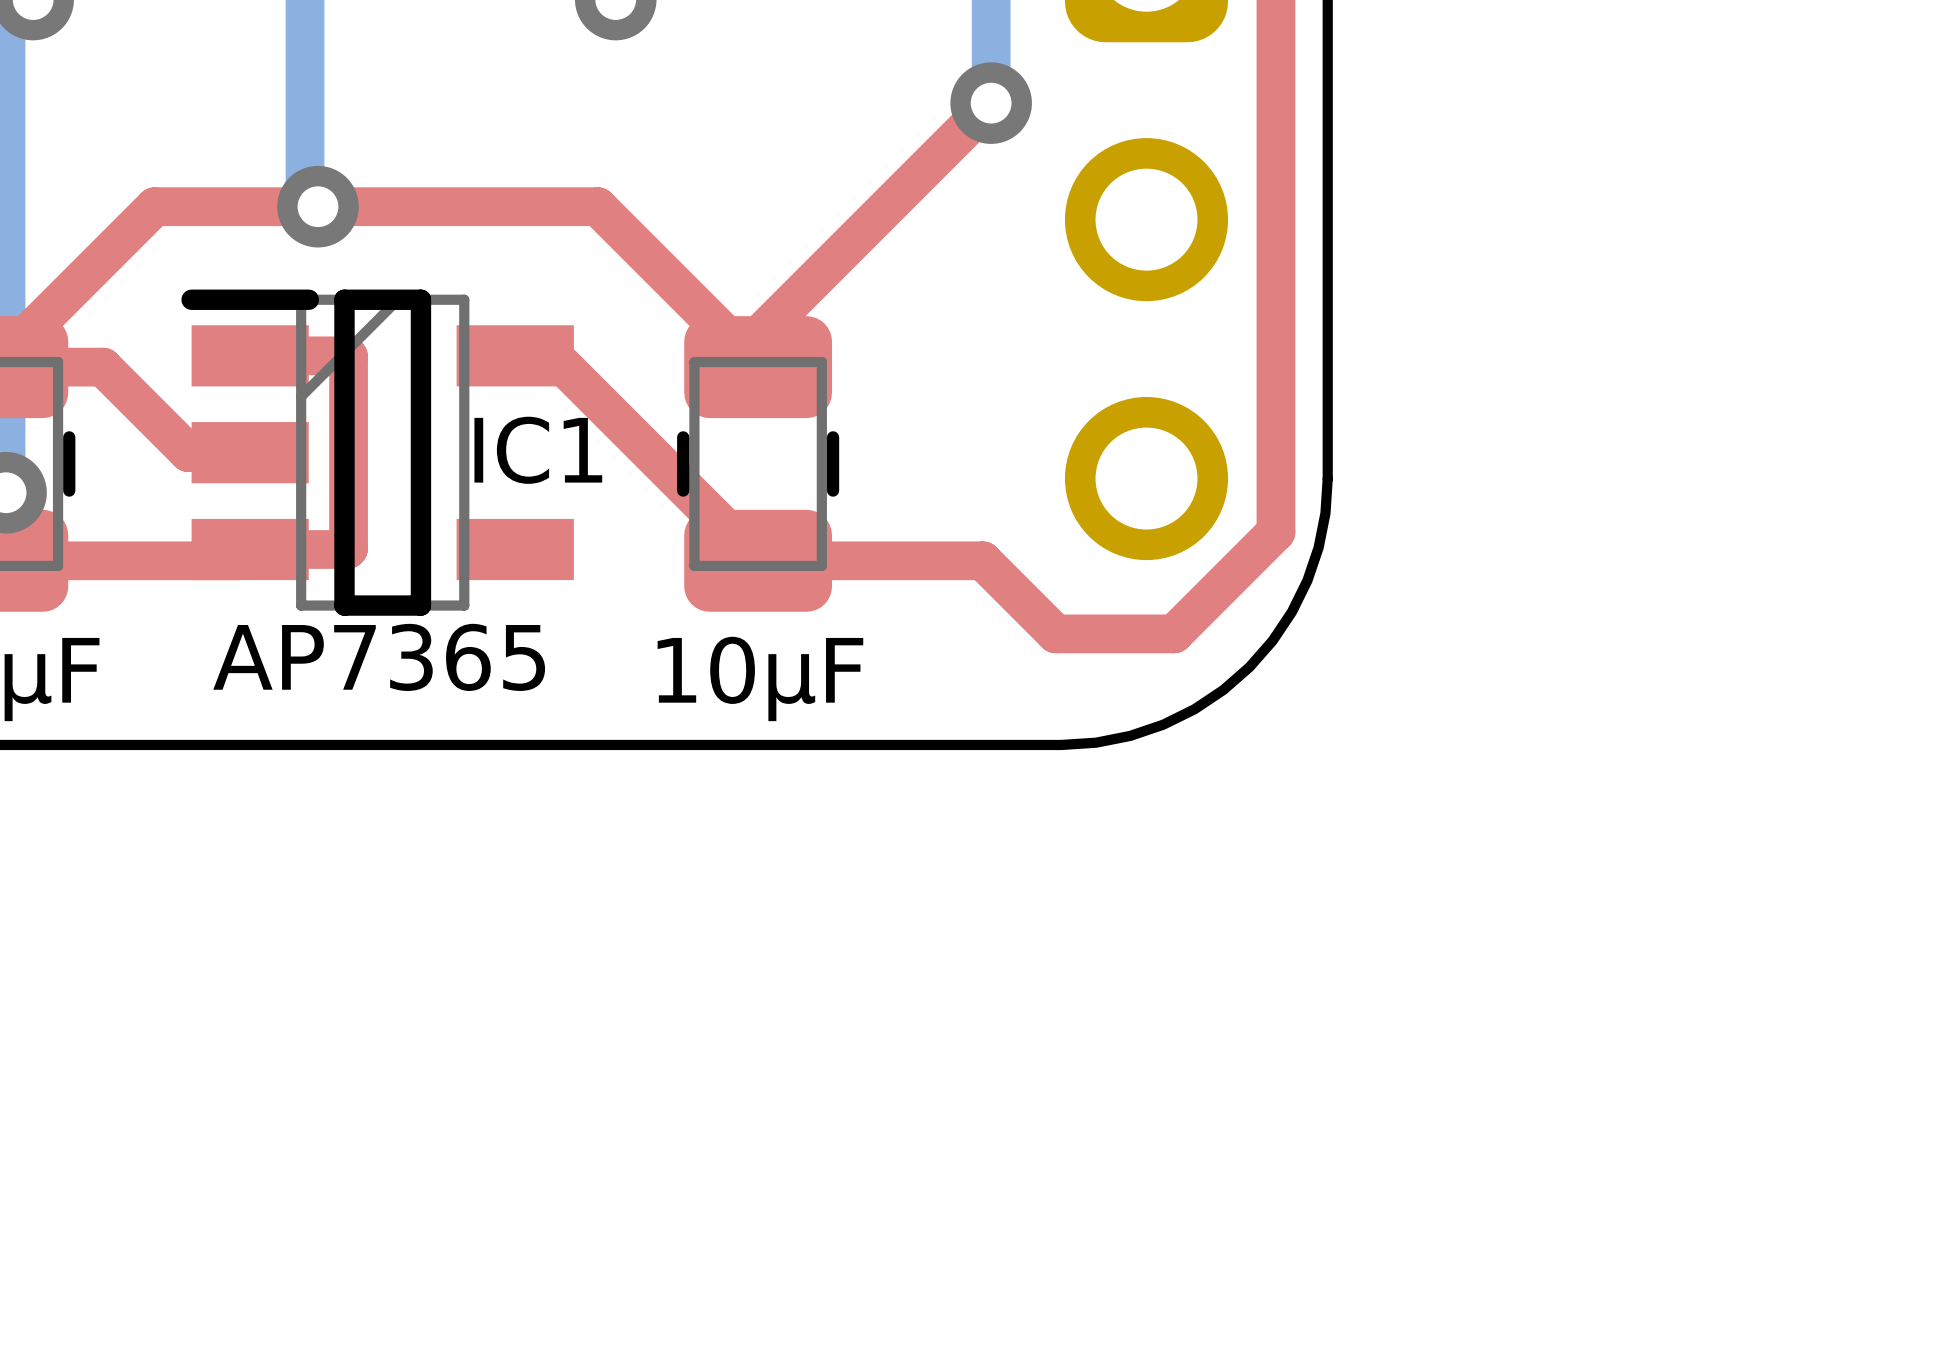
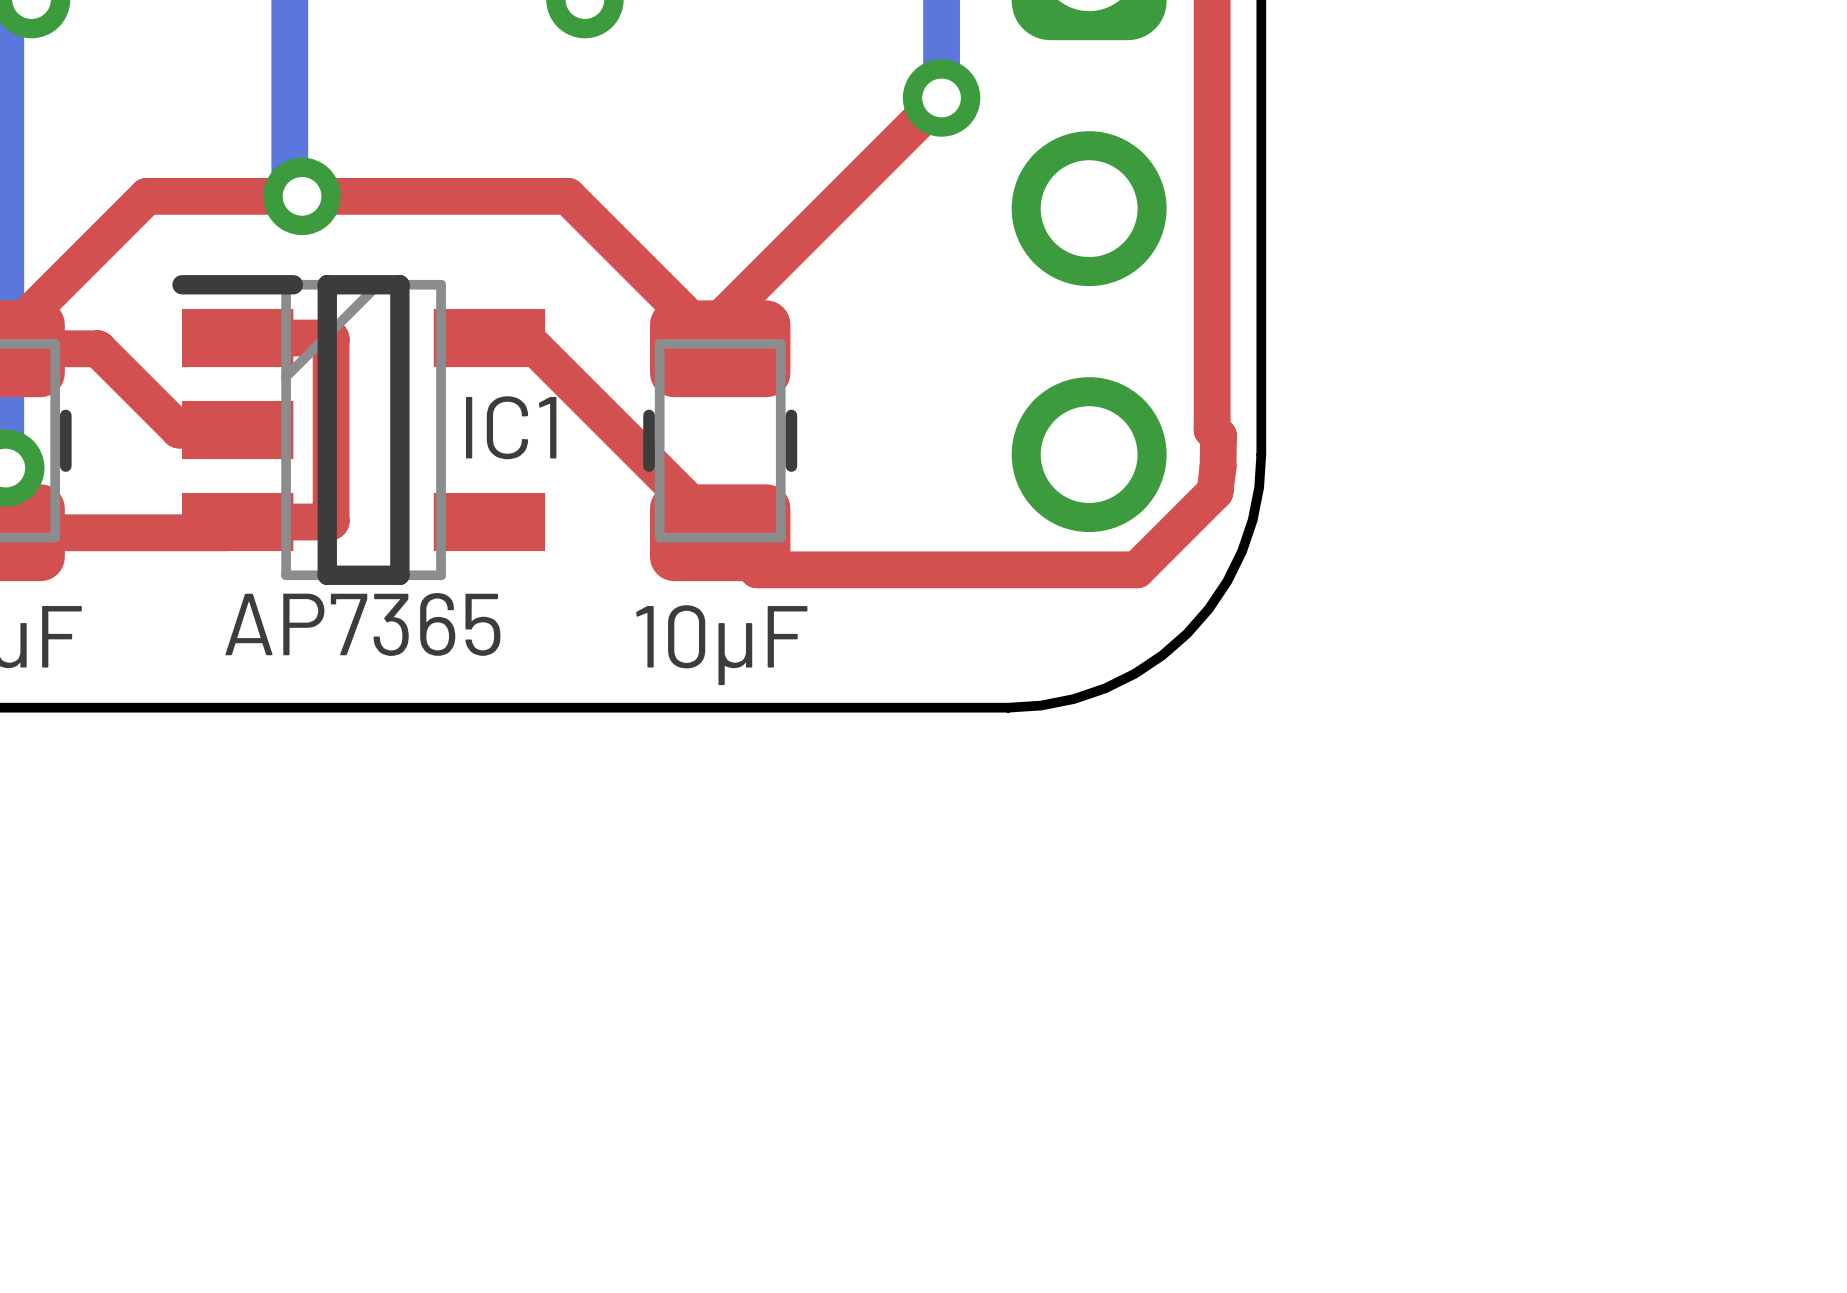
top track: (1275, 452) (1275, 531) (1174, 633) (1055, 633) (982, 560) (758, 560) -> (1212, 429) (1218, 436) (1215, 491) (1136, 569) (757, 569) (720, 532)

